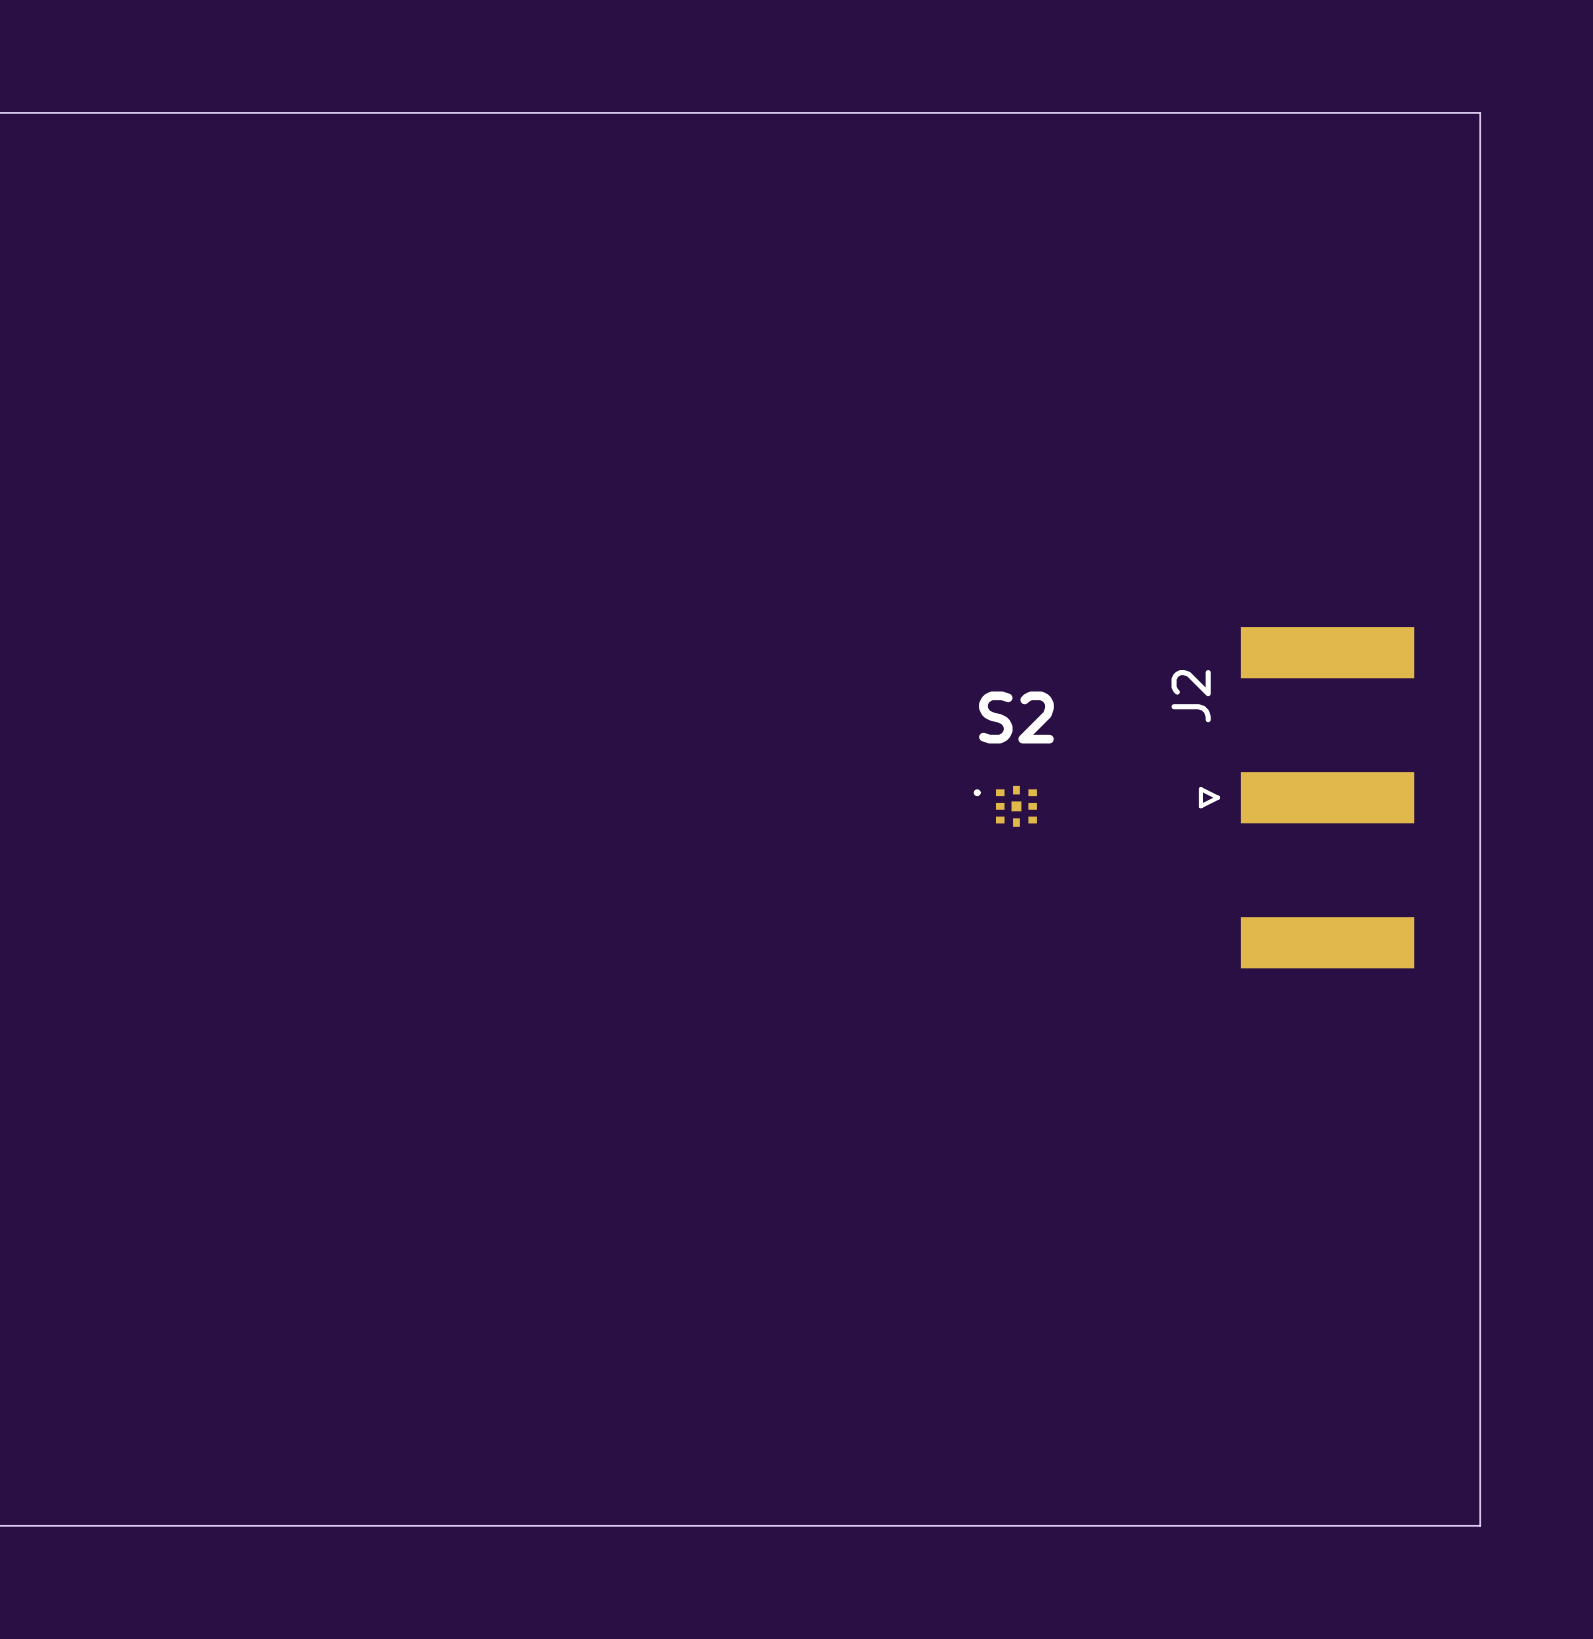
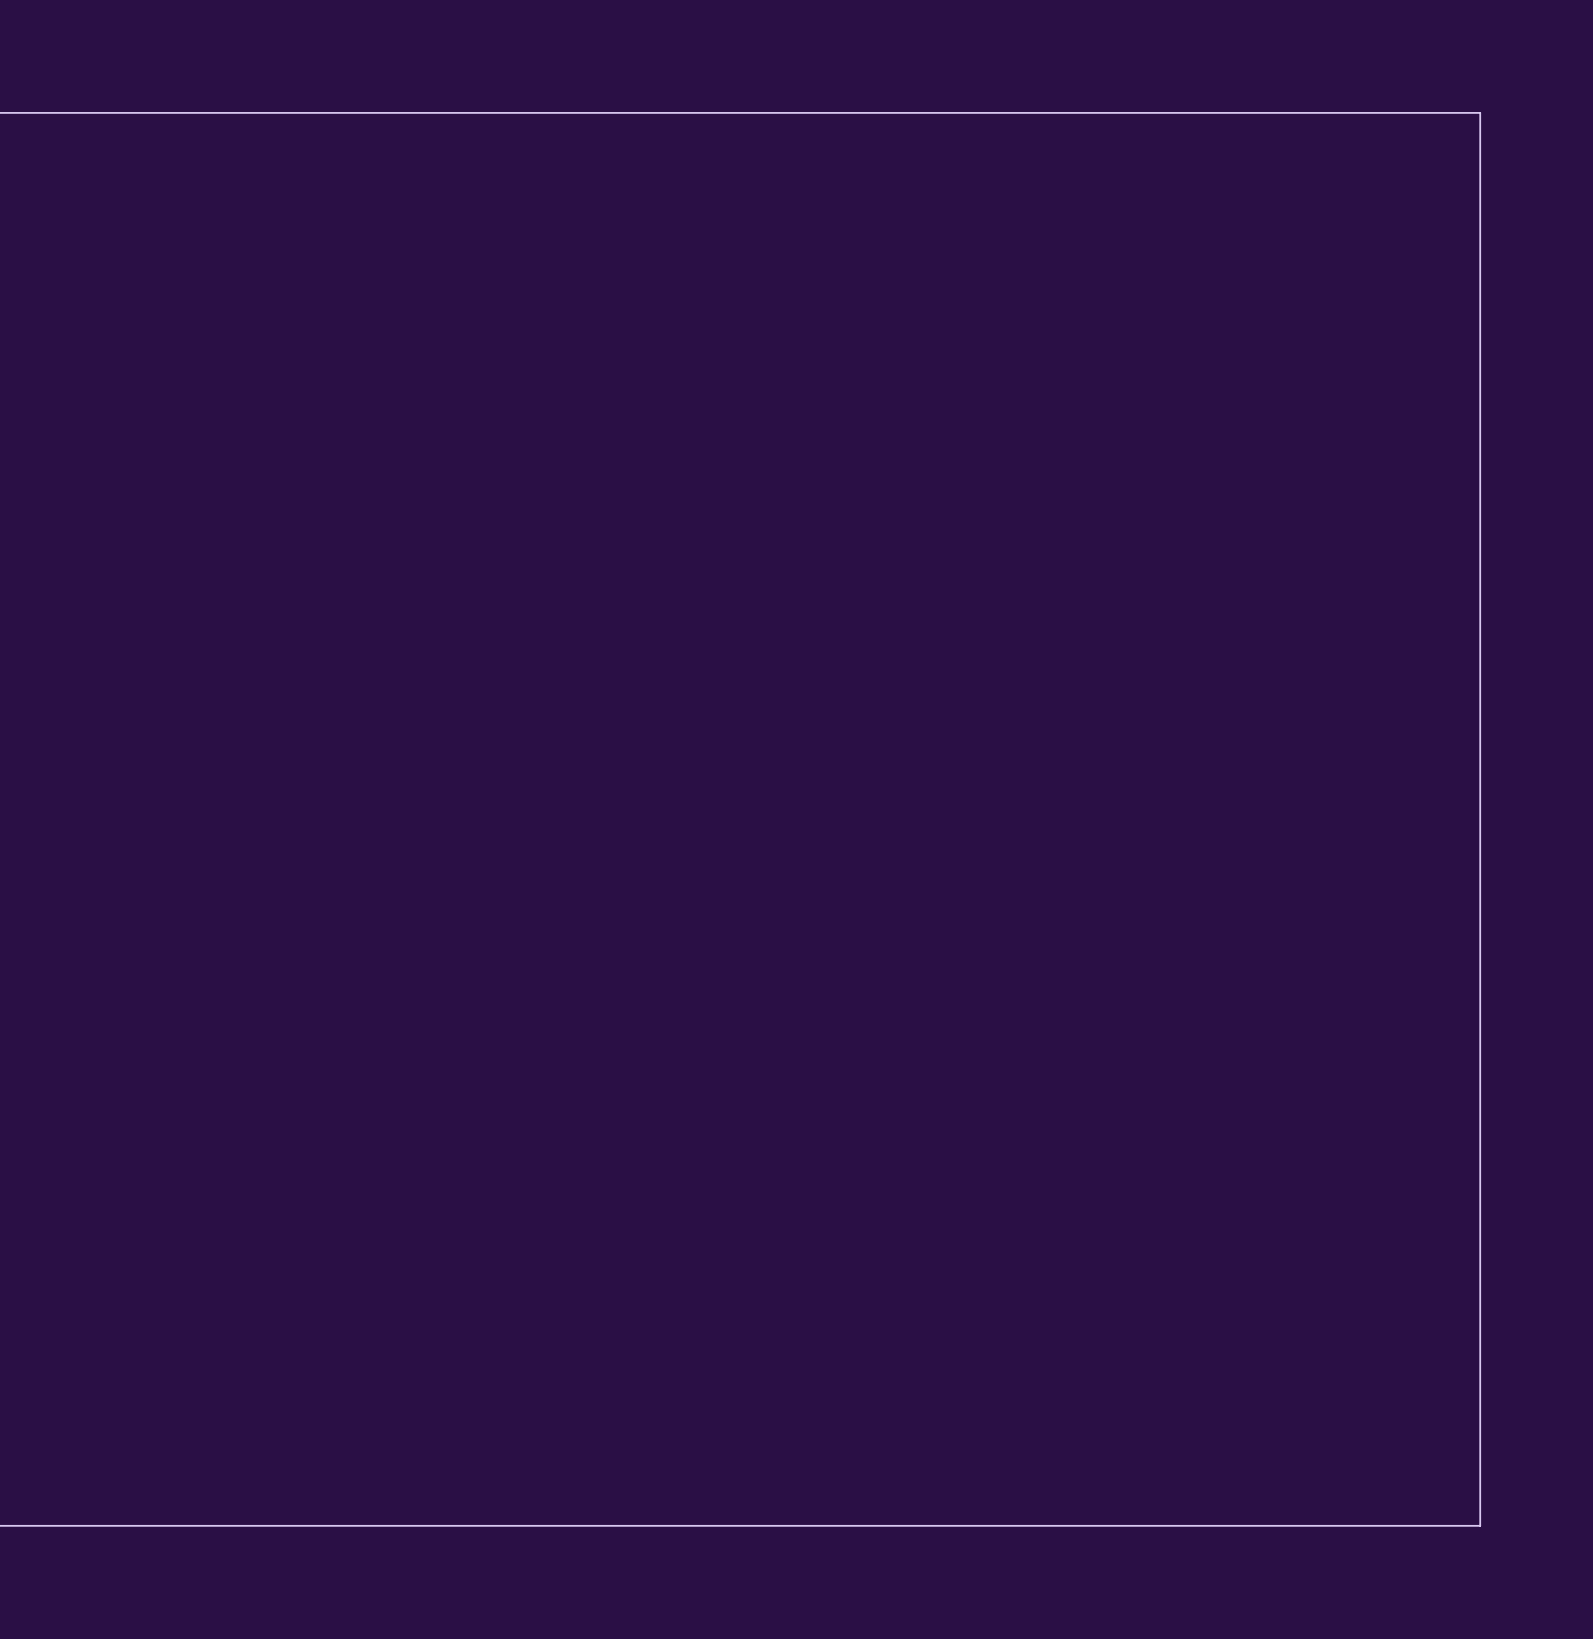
J2: (1306, 797) -> none
S2: (1005, 806) -> none

